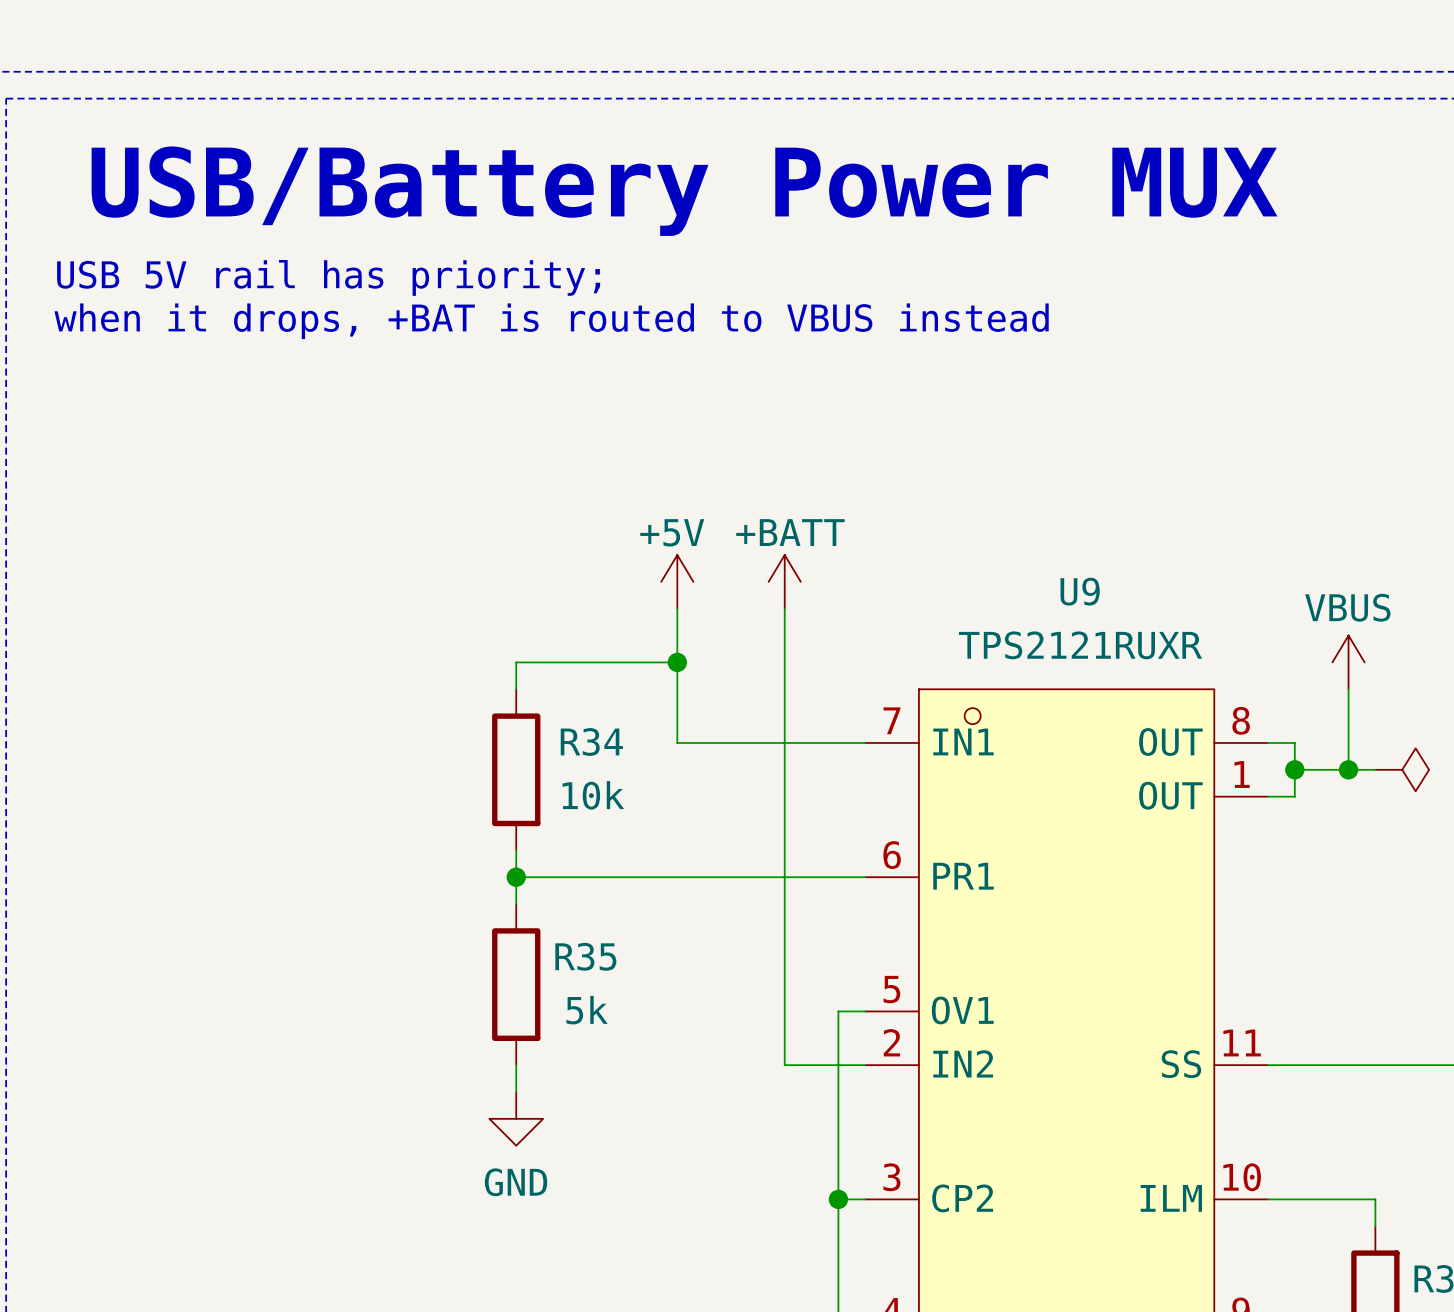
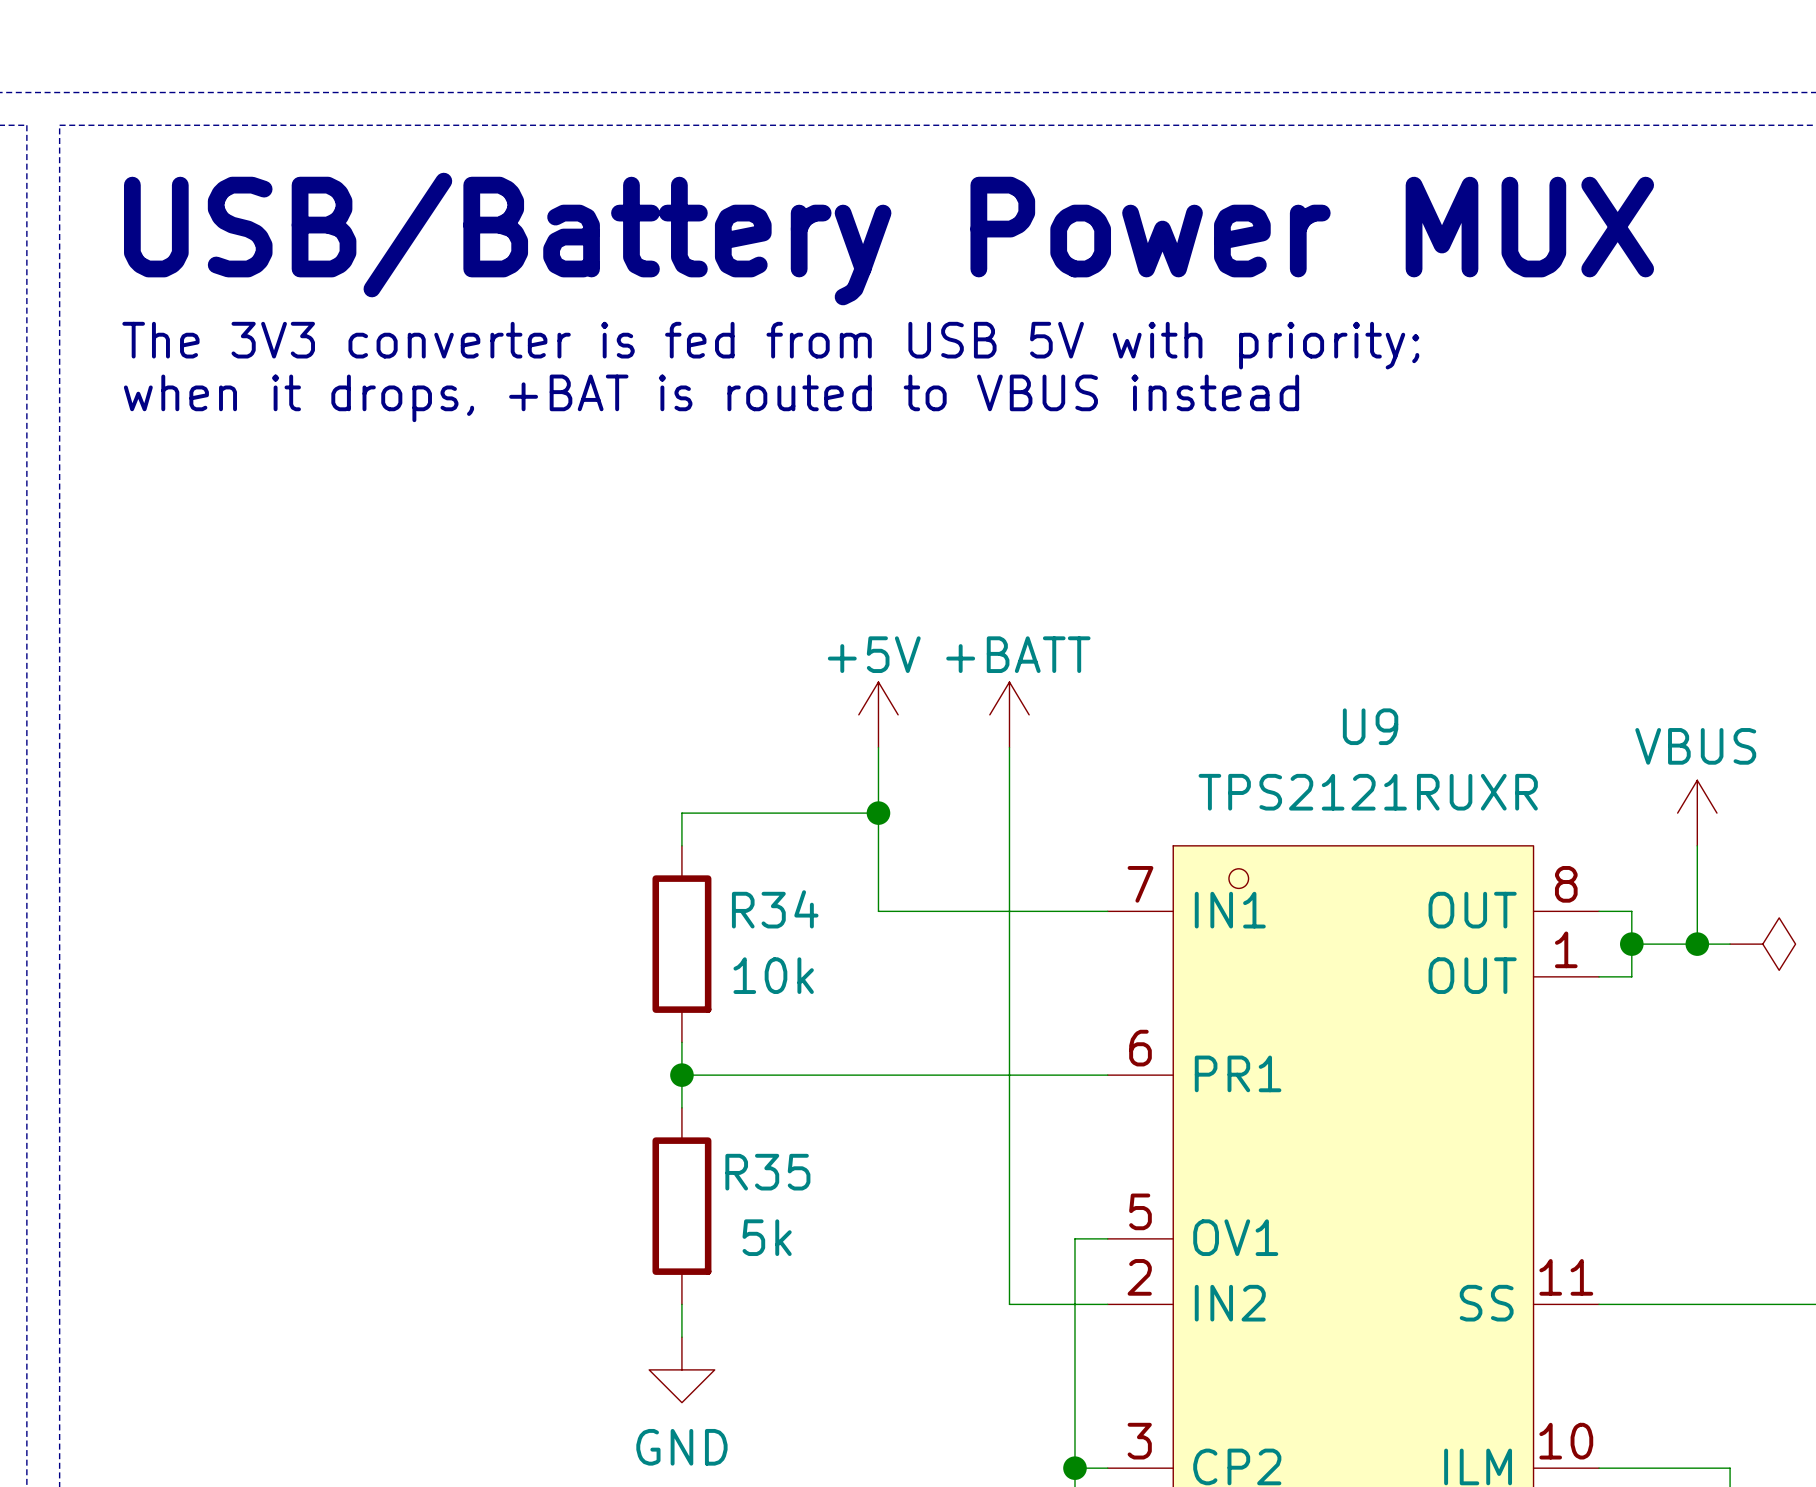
text: USB 5V rail has priority; (328, 277) -> The 3V3 converter is fed from USB 5V with priority; (770, 345)

